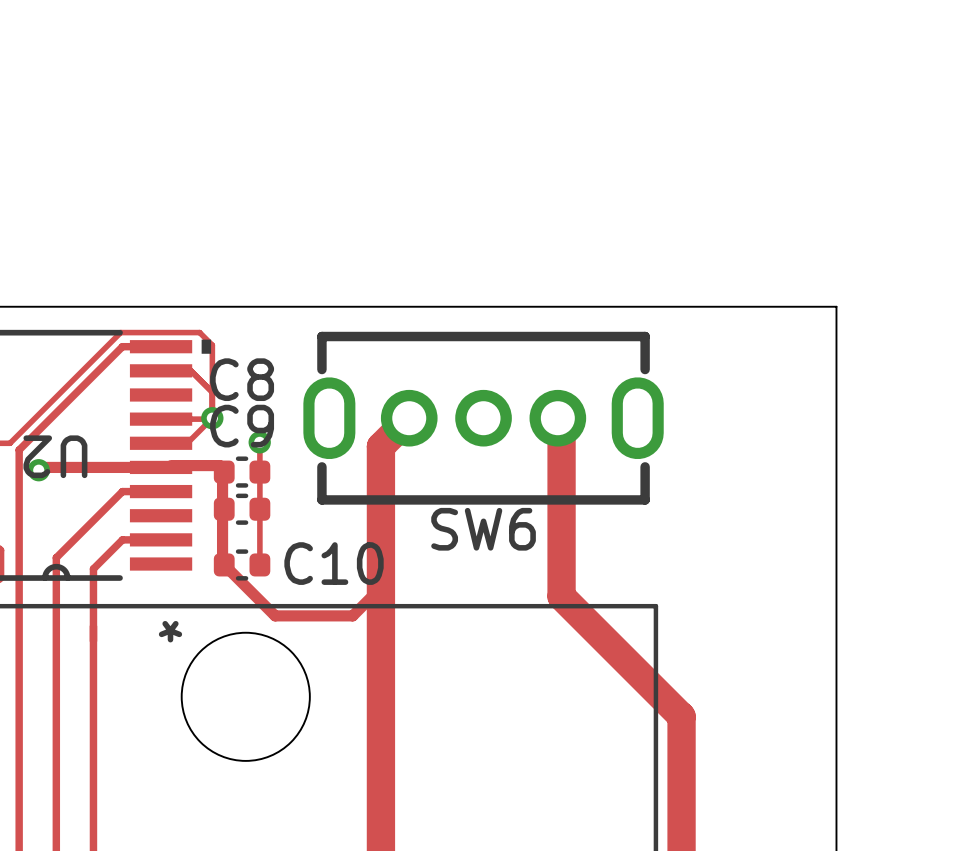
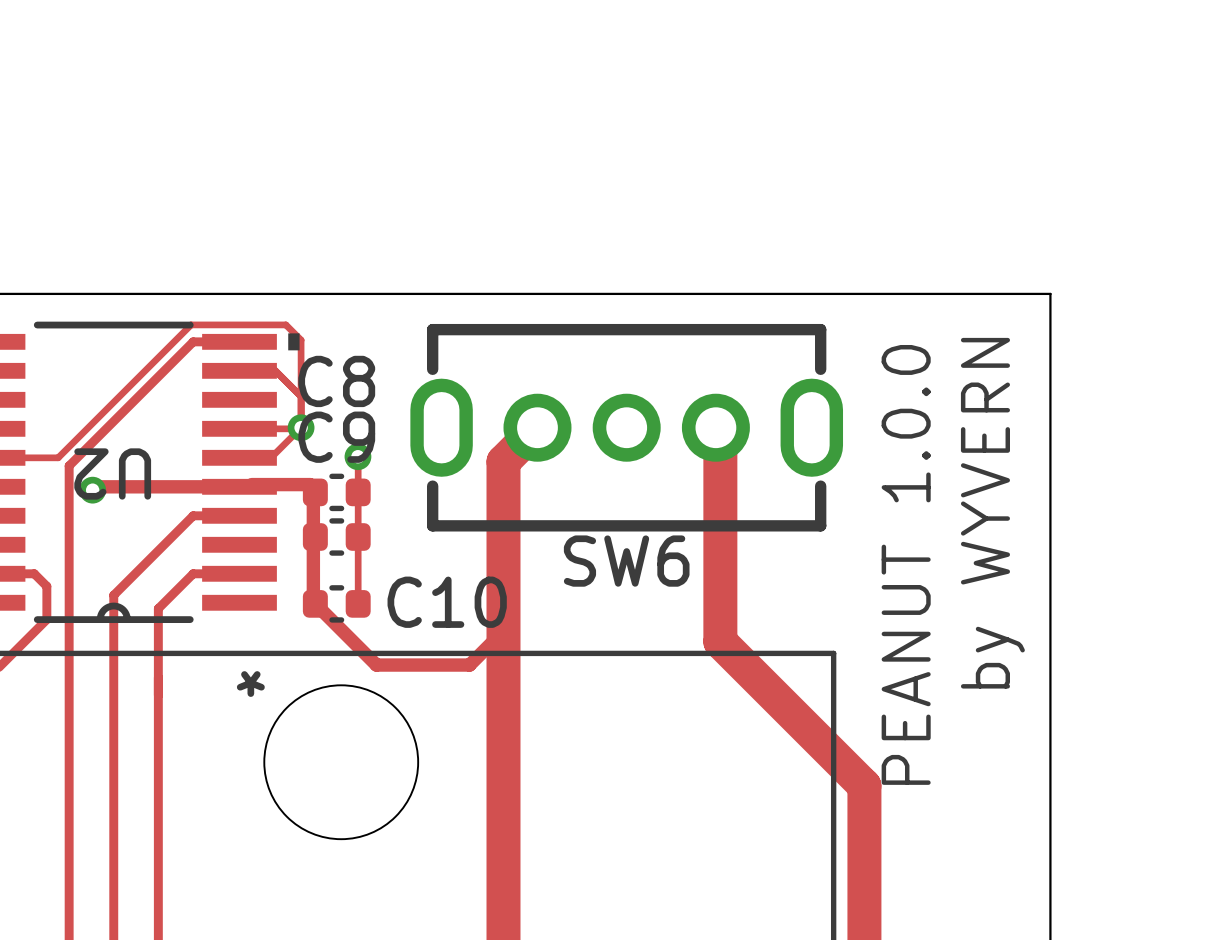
text: none -> by WYVERN (992, 513)
text: none -> PEANUT 1.0.0 (906, 564)

